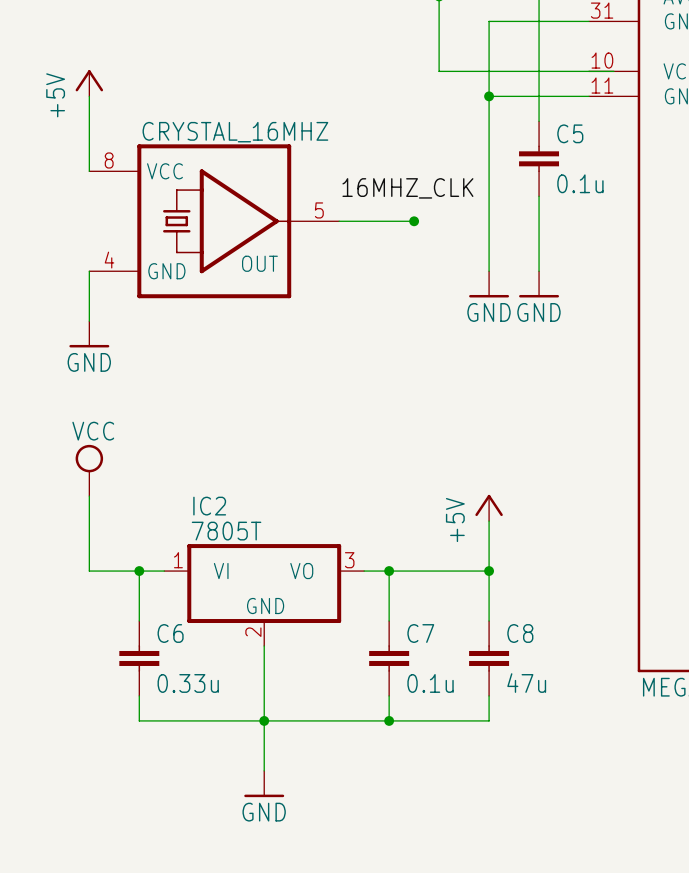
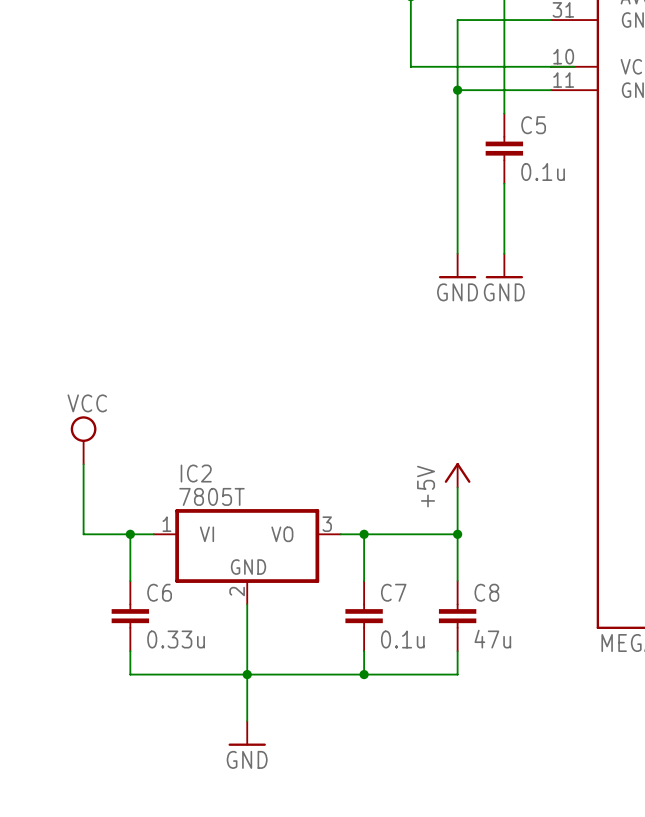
power symbol: +5V (89, 83) -> none
wire: (89, 96) (89, 171) -> none
label: 16MHZ_CLK (407, 188) -> none
CRYSTAL_16MHZ: (214, 221) -> none
wire: (339, 221) (414, 221) -> none
junction: (414, 221) -> none
wire: (89, 271) (89, 321) -> none
power symbol: GND (89, 334) -> none

